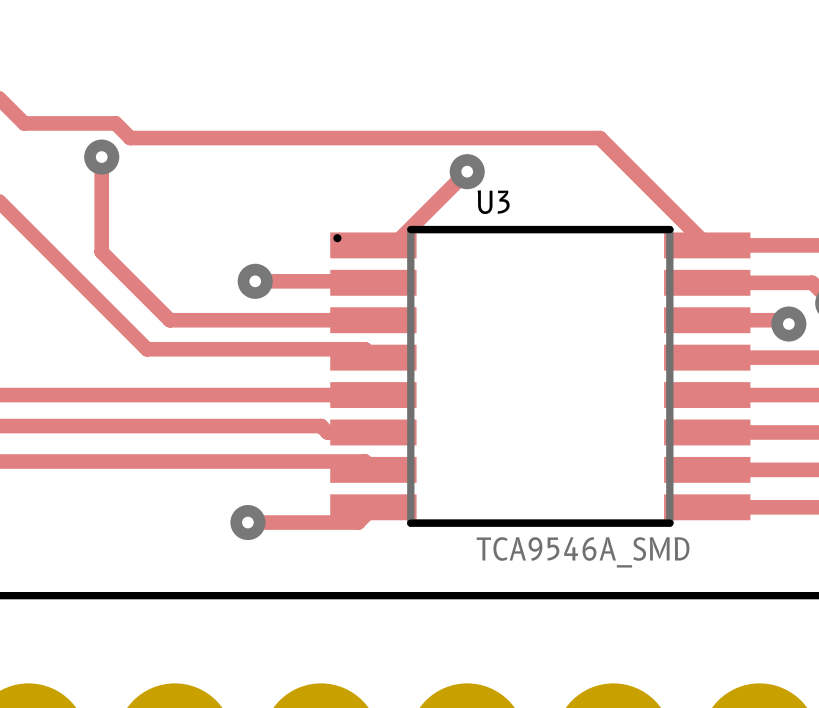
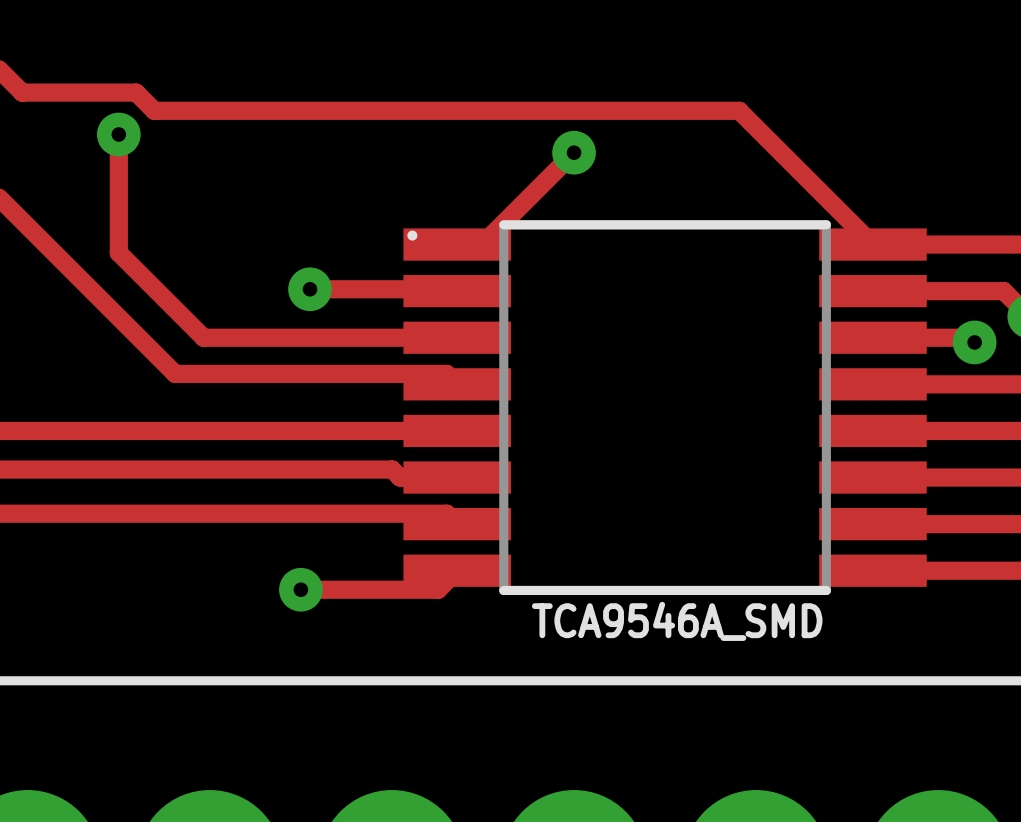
U3 name: U3 (493, 202) -> none
text: none -> TCA9546A_SMD (677, 621)
U3 value: TCA9546A_SMD (583, 552) -> none

